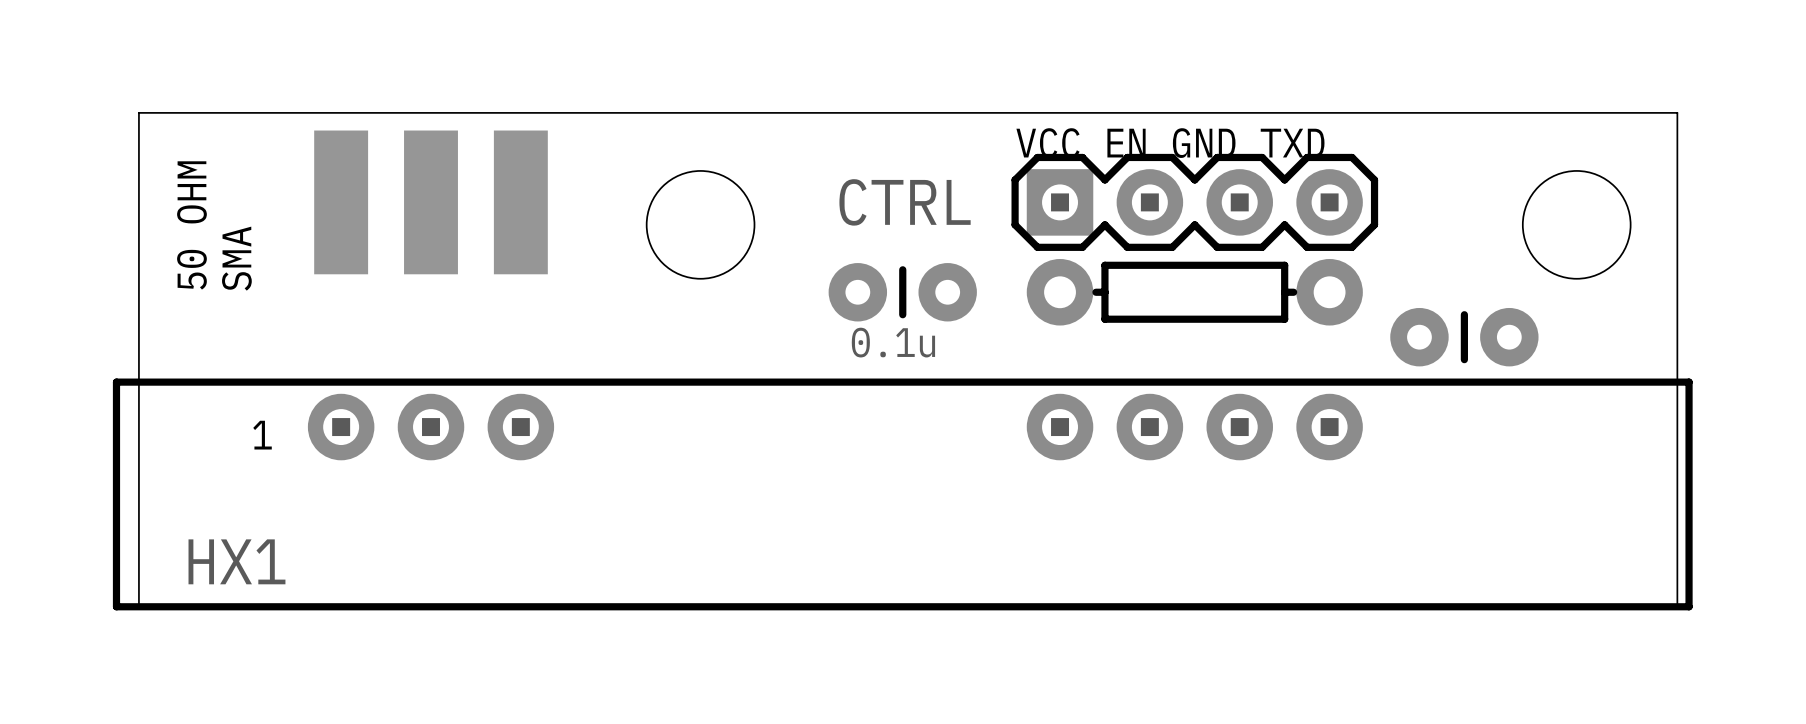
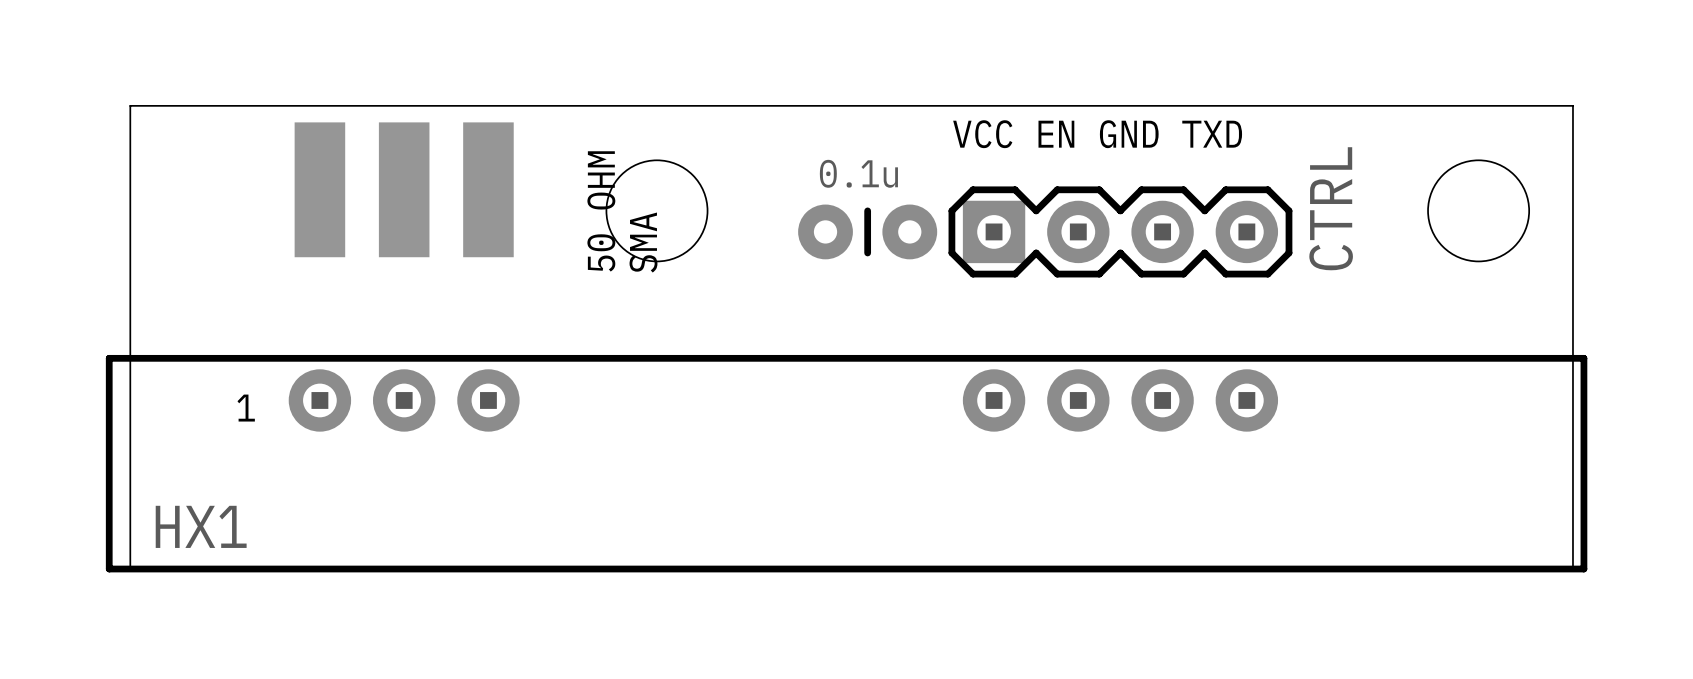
part value rotation: 0° (905, 202) -> 90° counterclockwise (1331, 208)
part value position: CTRL (905, 202) -> CTRL (1331, 208)
part position: (1194, 202) -> (1120, 231)
text position: 50 OHM (191, 225) -> 50 OHM (601, 211)
text position: SMA (236, 258) -> SMA (643, 242)
part position: (902, 292) -> (867, 231)
part: (1194, 292) -> none
part: (1464, 337) -> none
part value position: 0.1u (893, 342) -> 0.1u (858, 173)
part value position: HX1 (236, 561) -> HX1 (201, 526)

